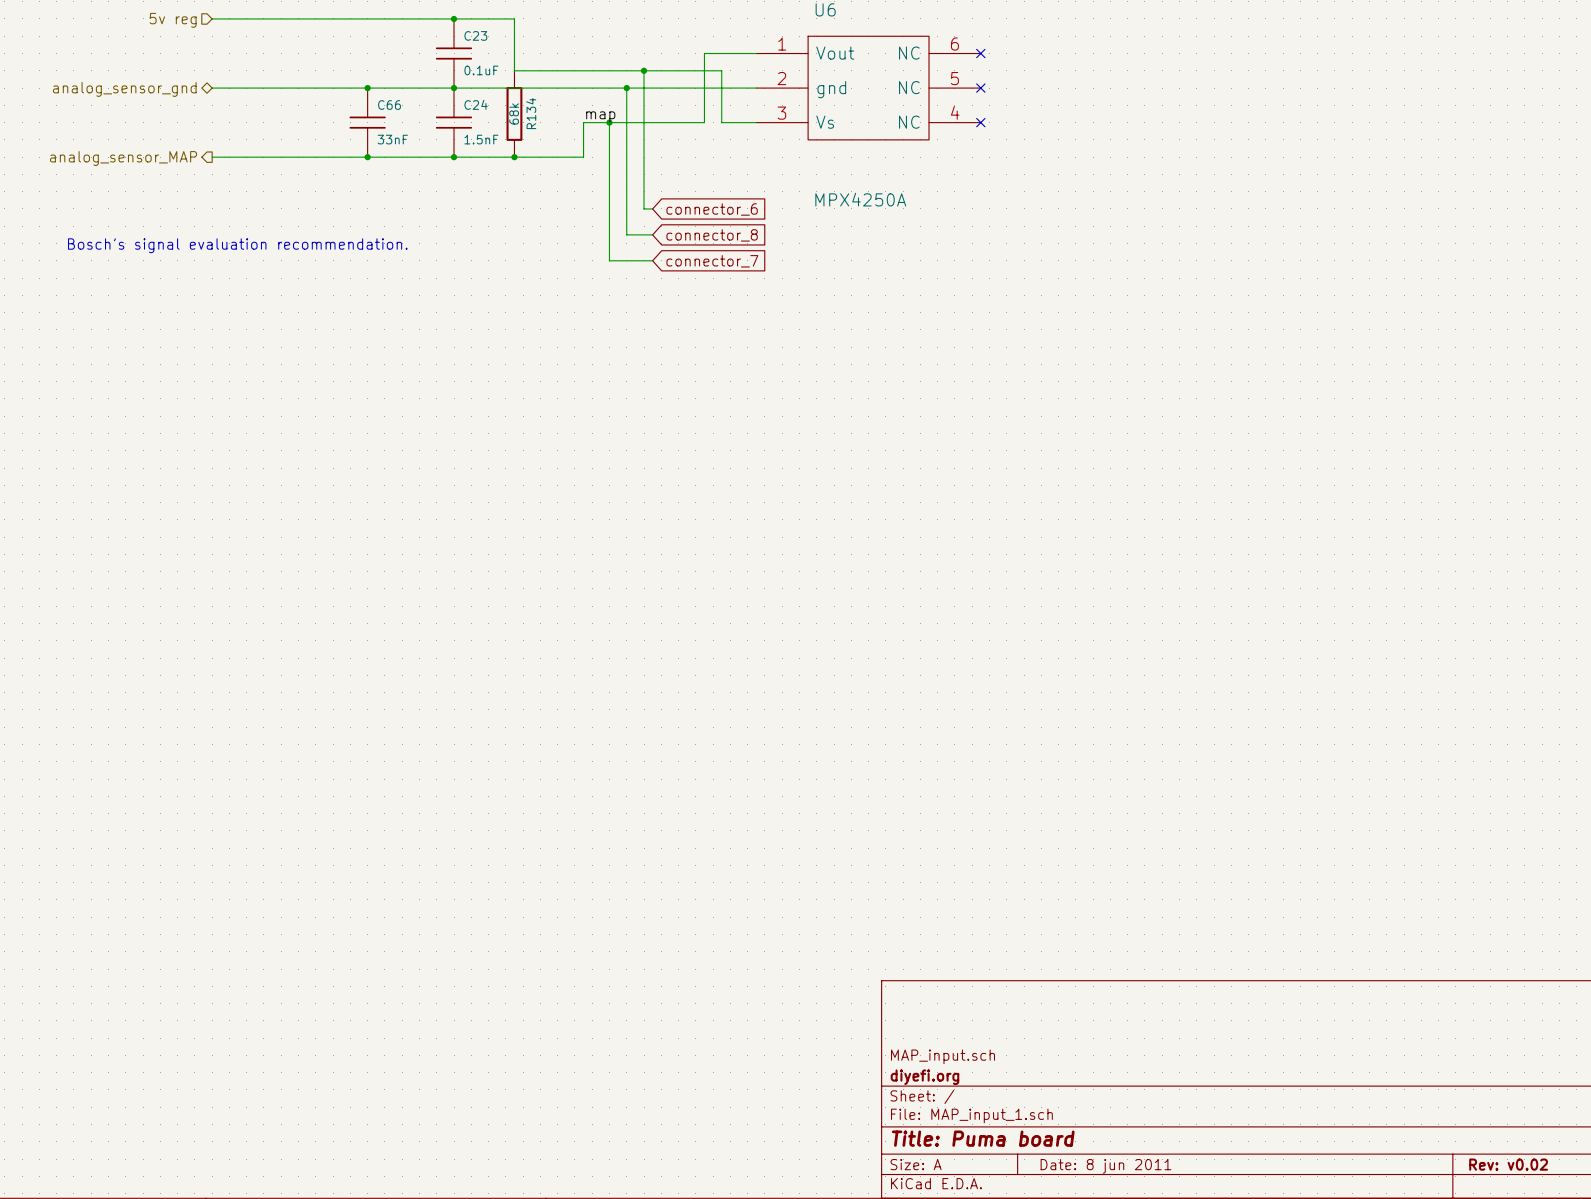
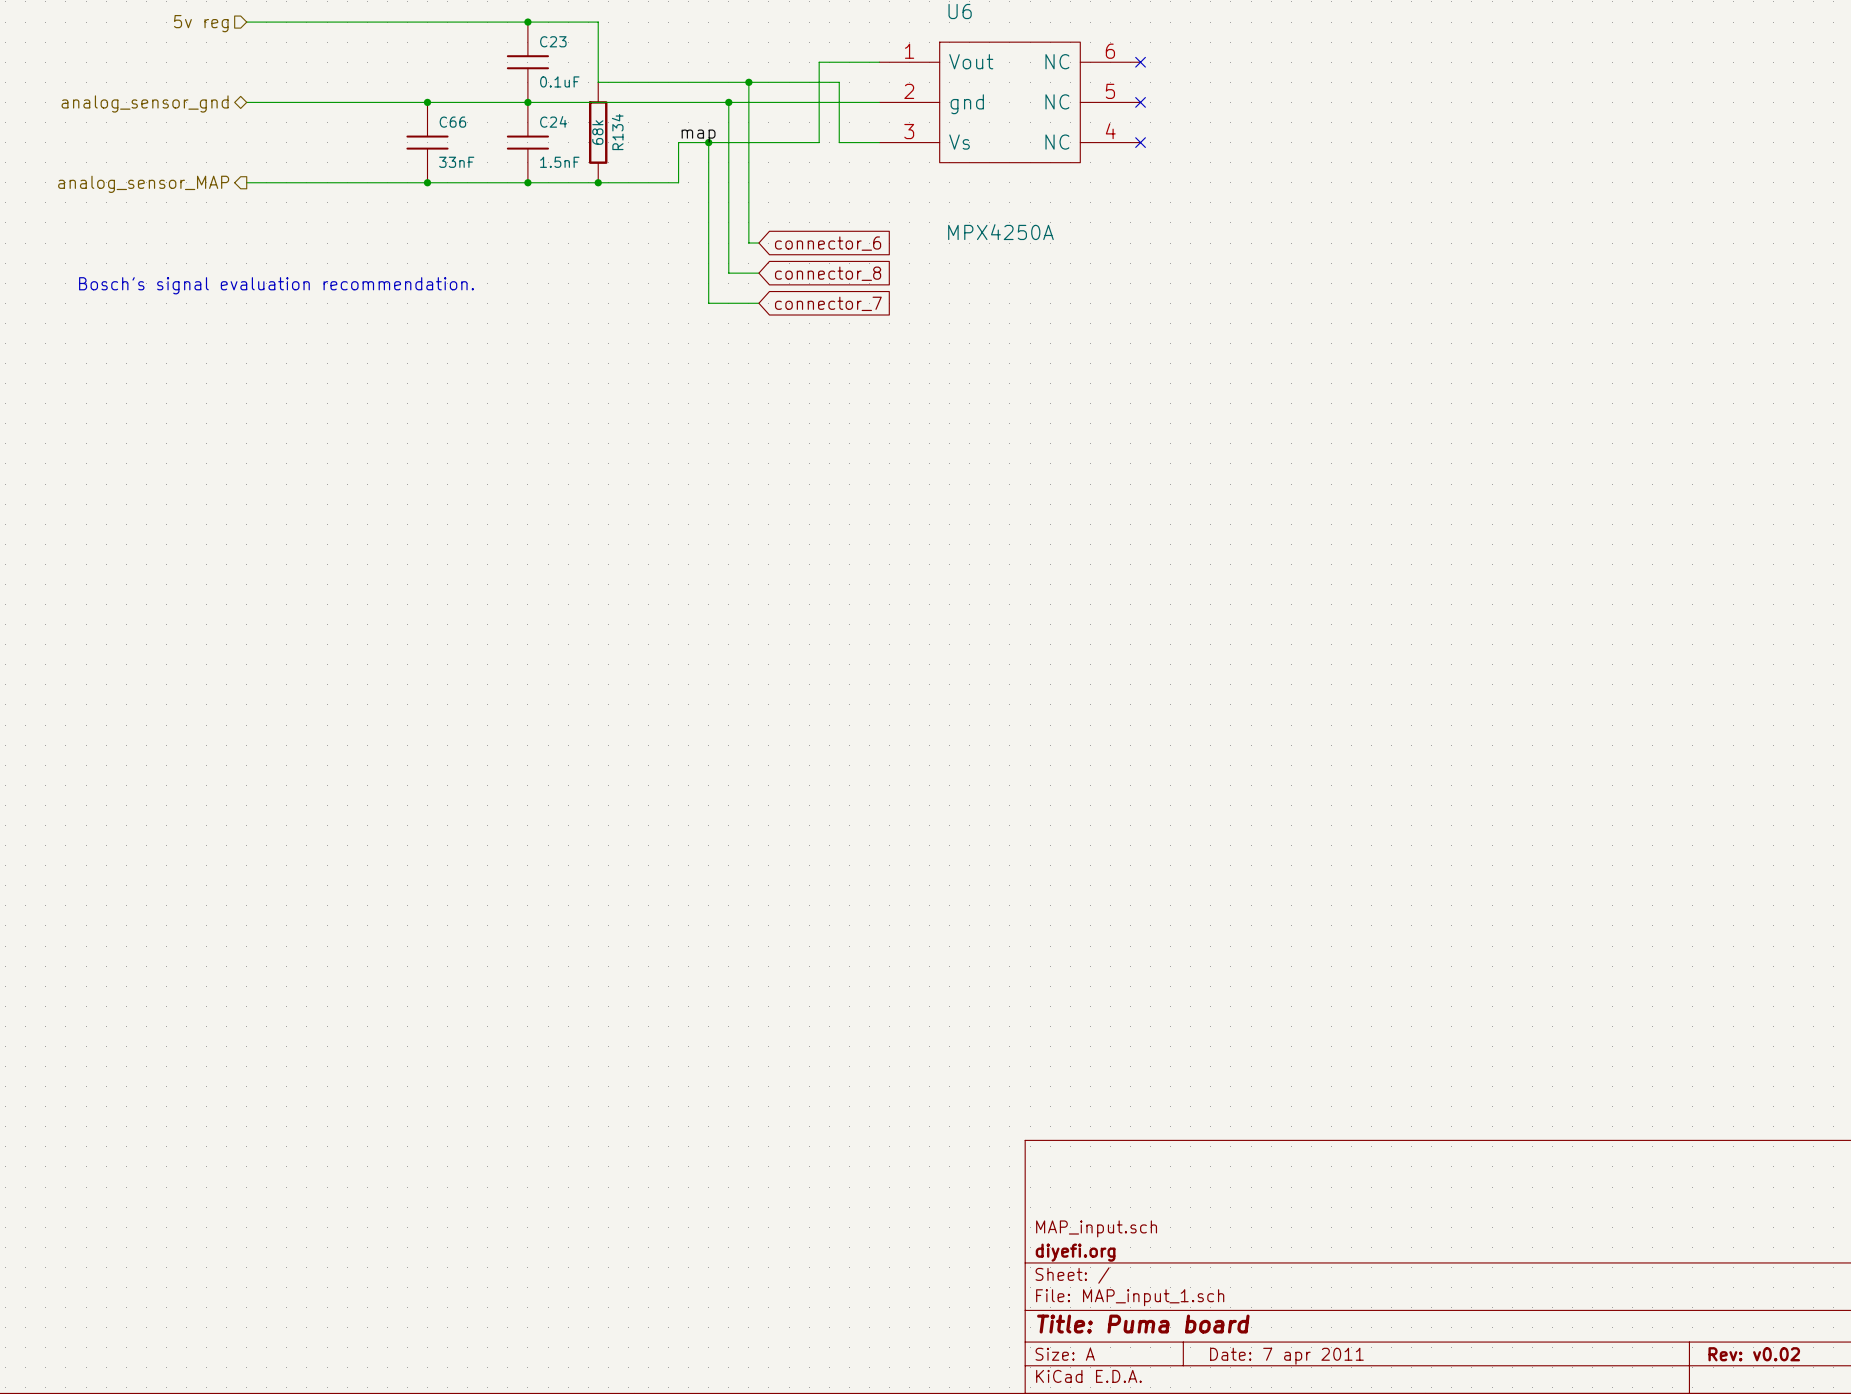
title block: Date: 8 jun 2011 (1105, 1166) -> Date: 7 apr 2011 (1286, 1356)

